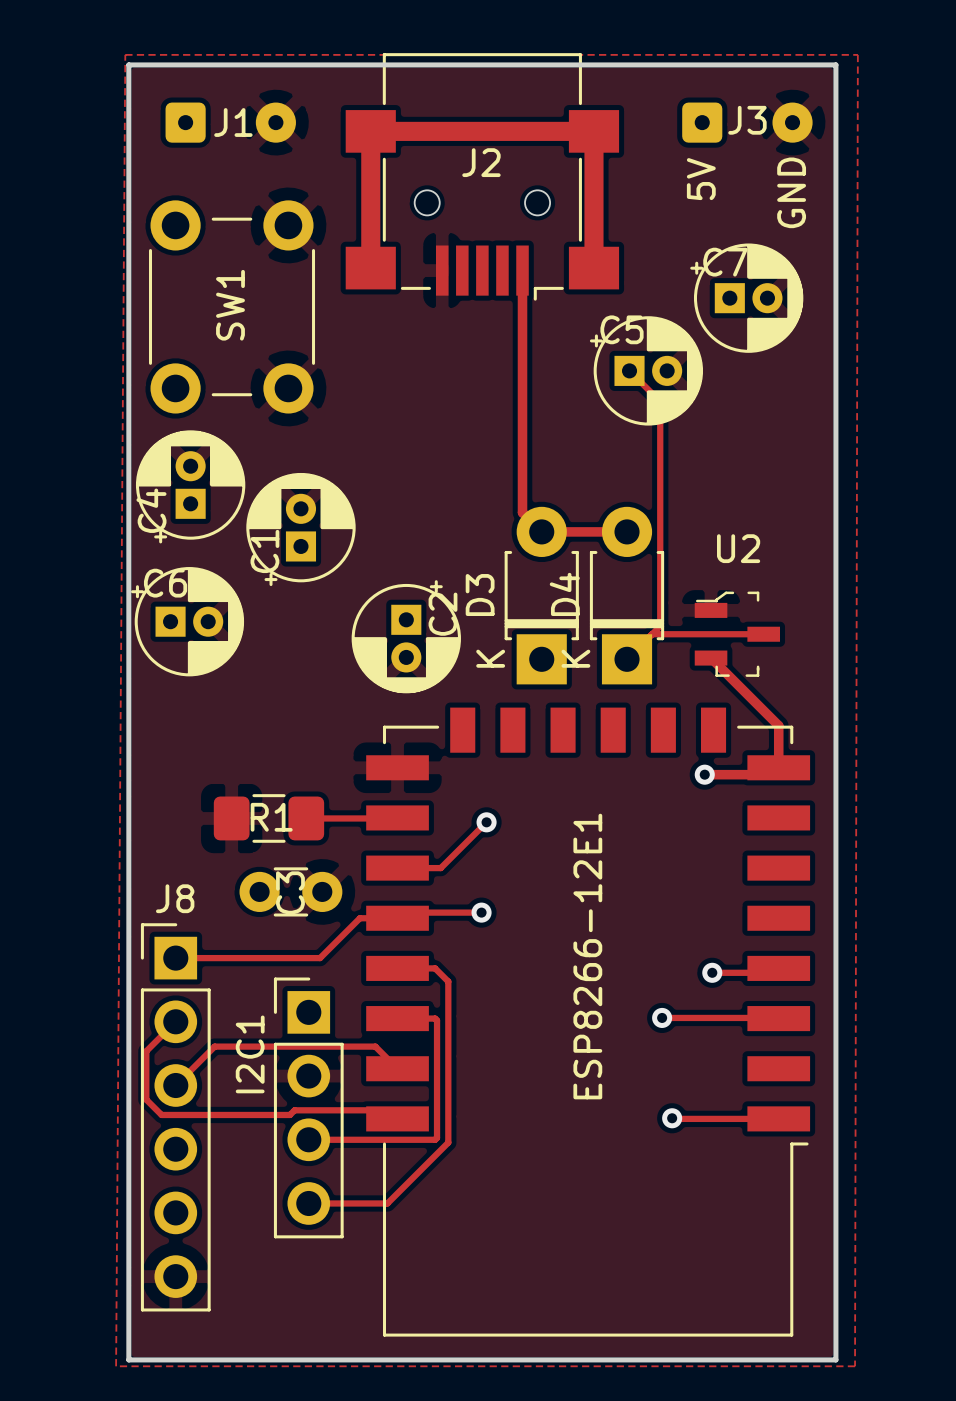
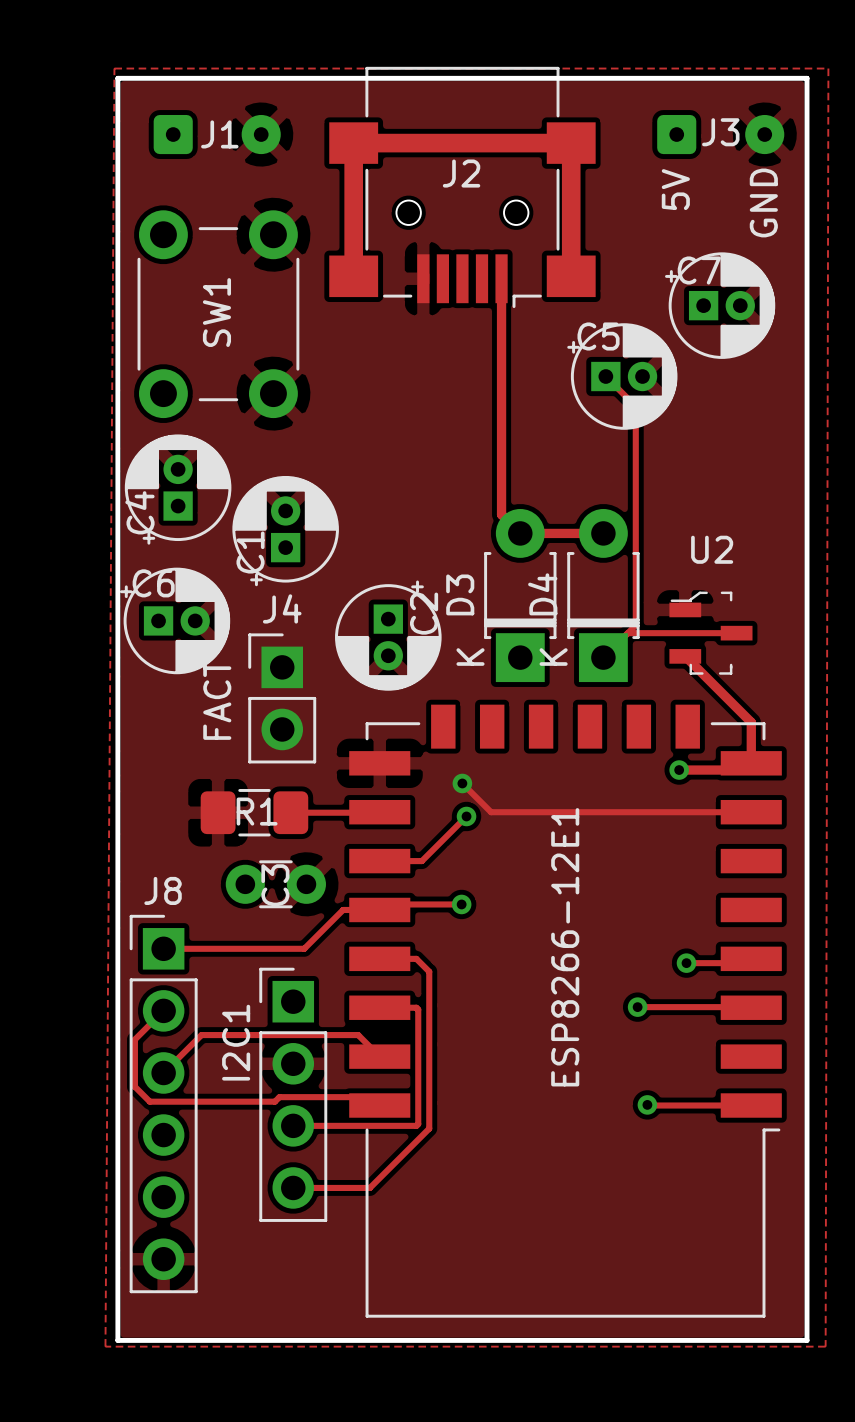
J4: none -> (282, 698)
text: none -> FACT (217, 699)
track: none -> (462, 783) (491, 812) (751, 812)
via: none -> (462, 783)

